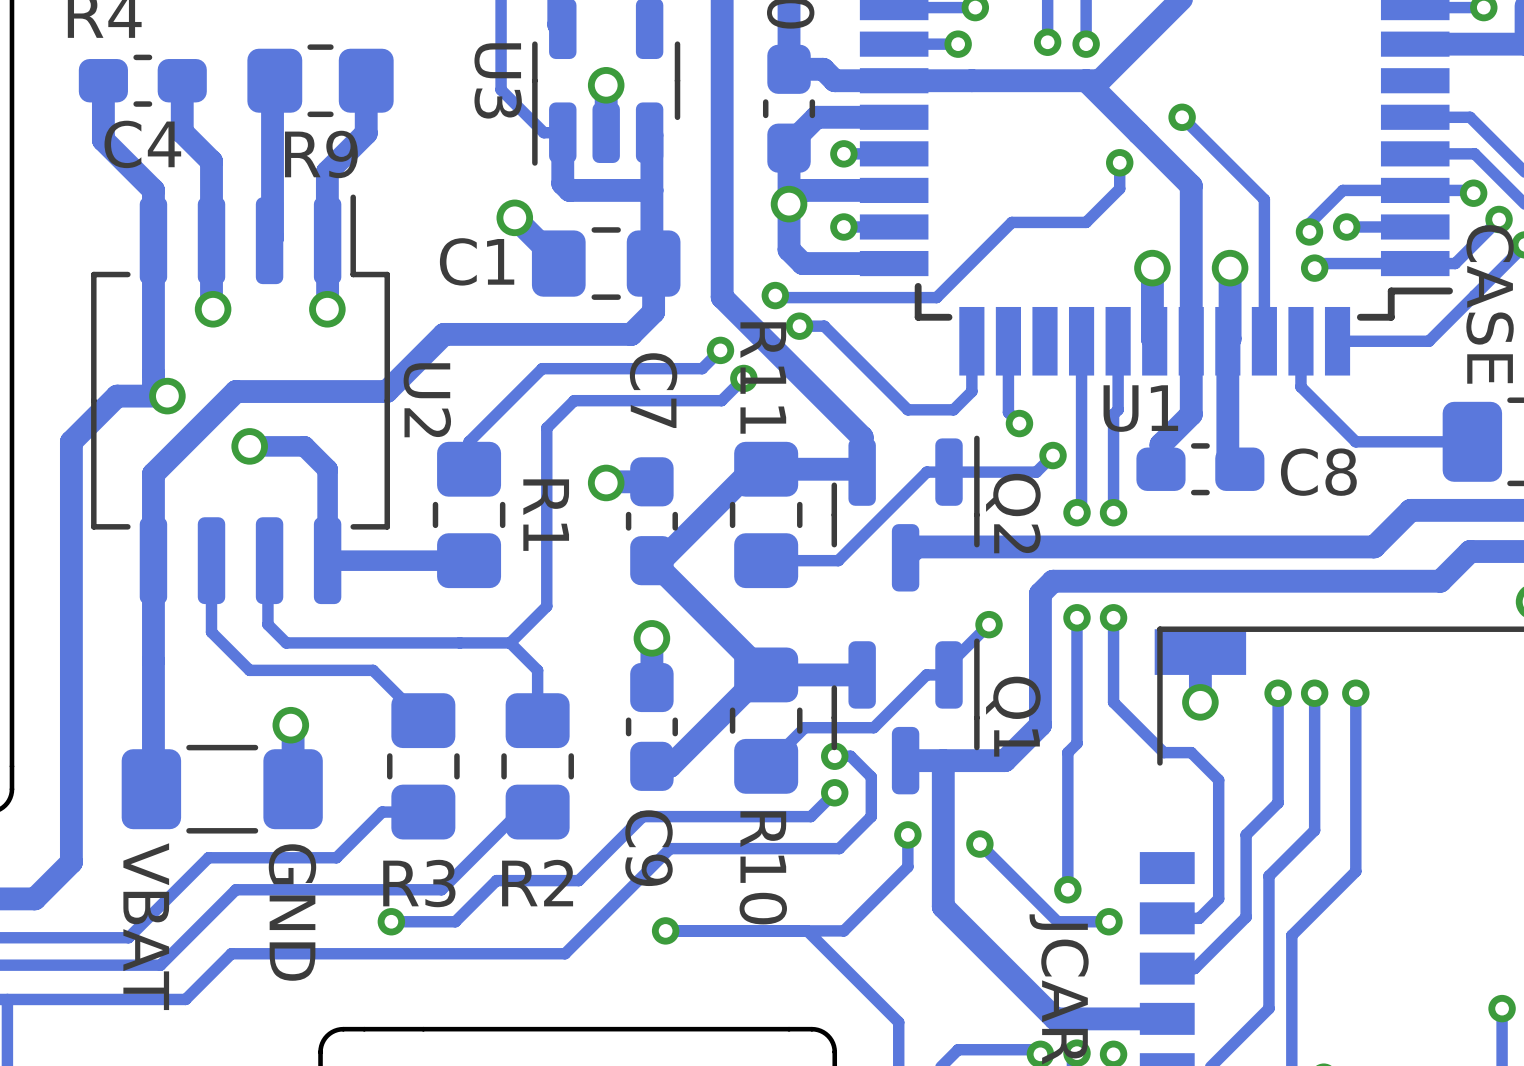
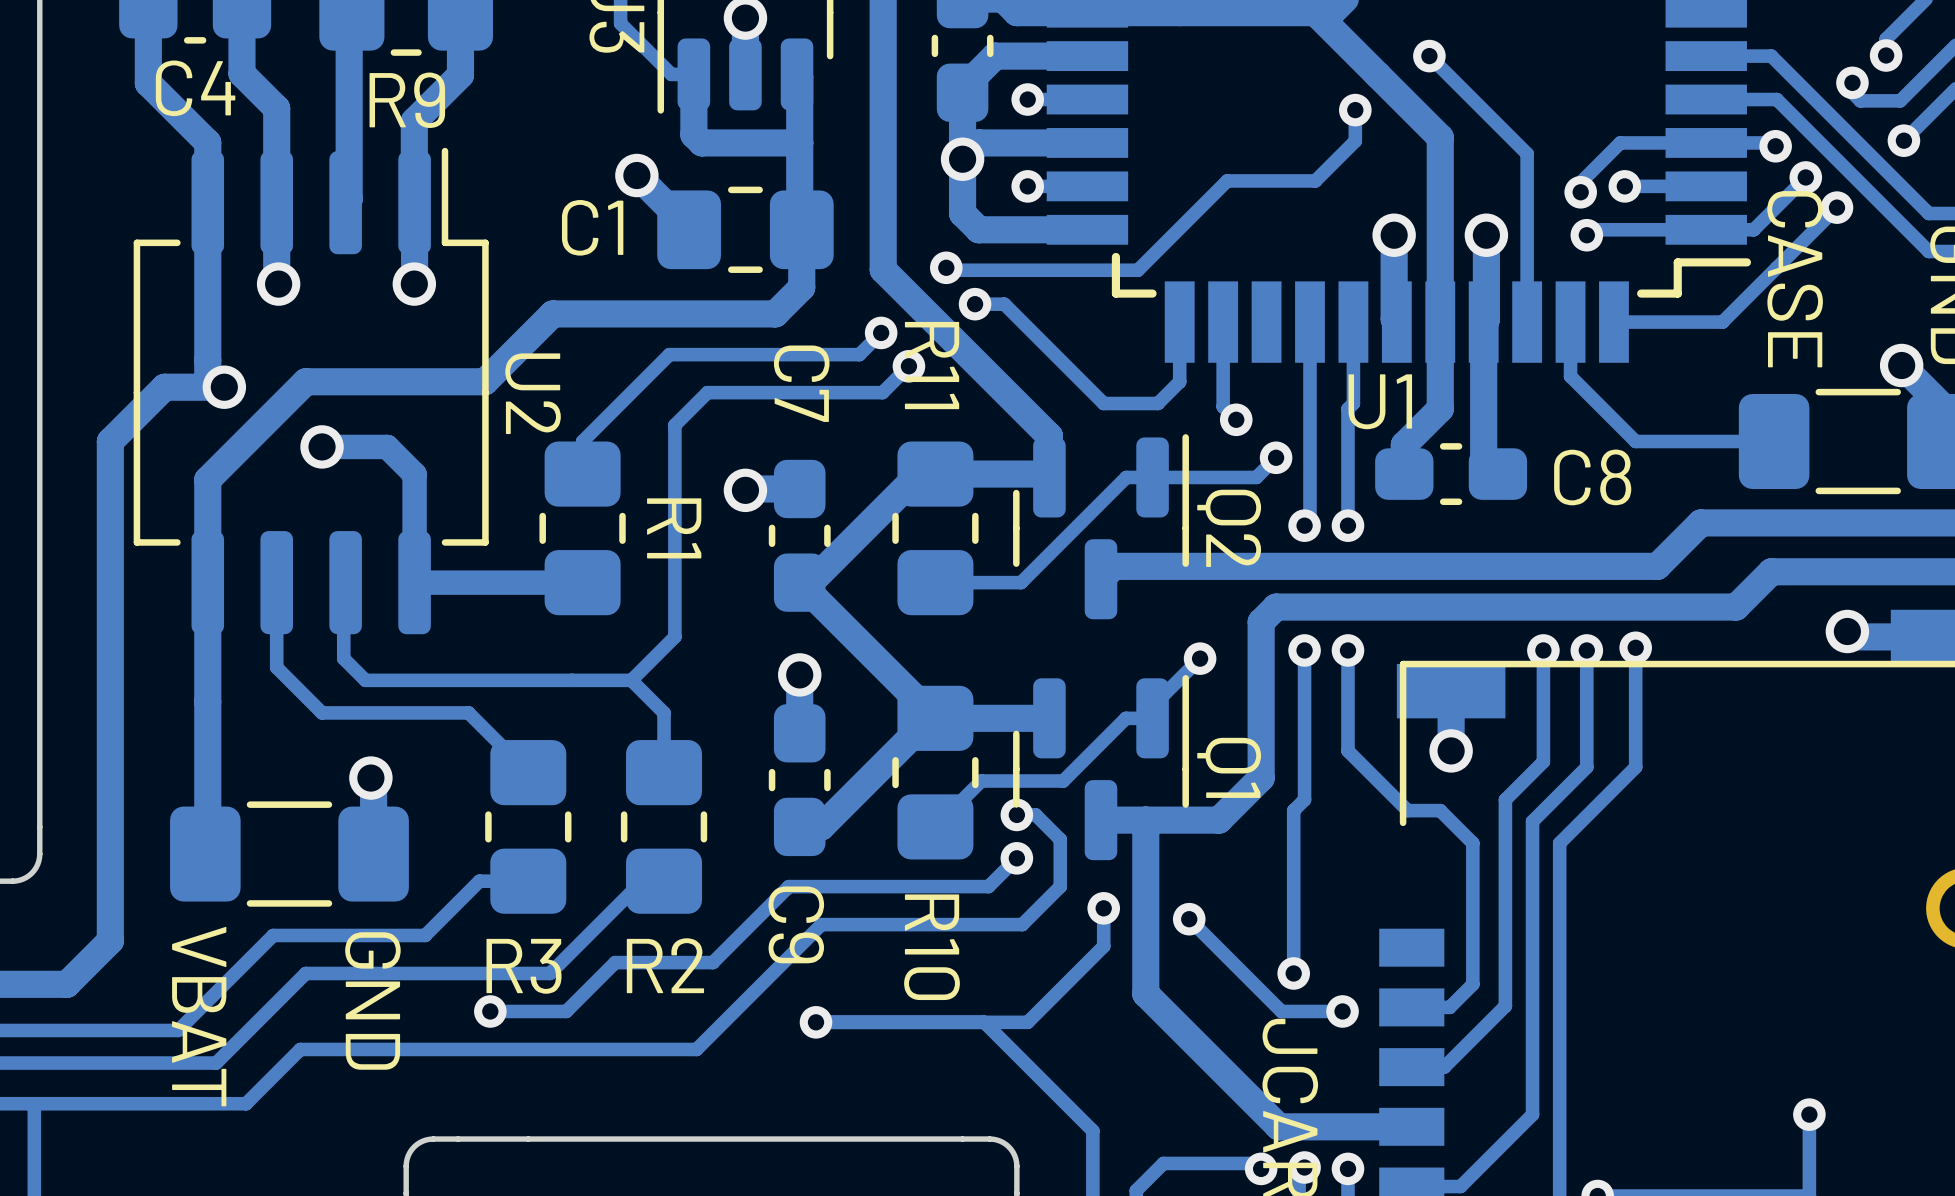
track: none -> (1635, 647) (1635, 740)
via: none -> (1635, 647)
track: none -> (1543, 650) (1543, 740)
via: none -> (1543, 650)
track: none -> (1586, 650) (1586, 740)
via: none -> (1586, 650)
via: (1278, 693) -> none
via: (1314, 693) -> none
via: (1355, 693) -> none
track: (1278, 711) (1278, 802) (1246, 834) -> (1543, 761) (1505, 799) (1505, 908)
track: (1314, 716) (1314, 830) (1268, 876) -> (1586, 767) (1532, 821) (1532, 957)
track: (1355, 716) (1355, 871) (1291, 935) -> (1635, 767) (1559, 843) (1559, 1027)

